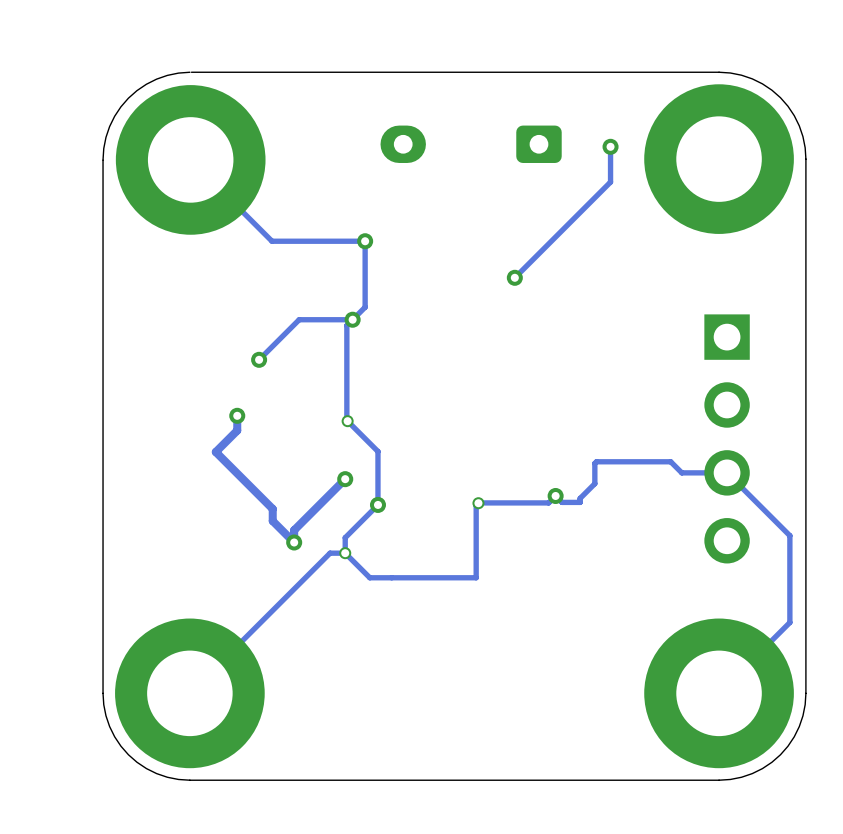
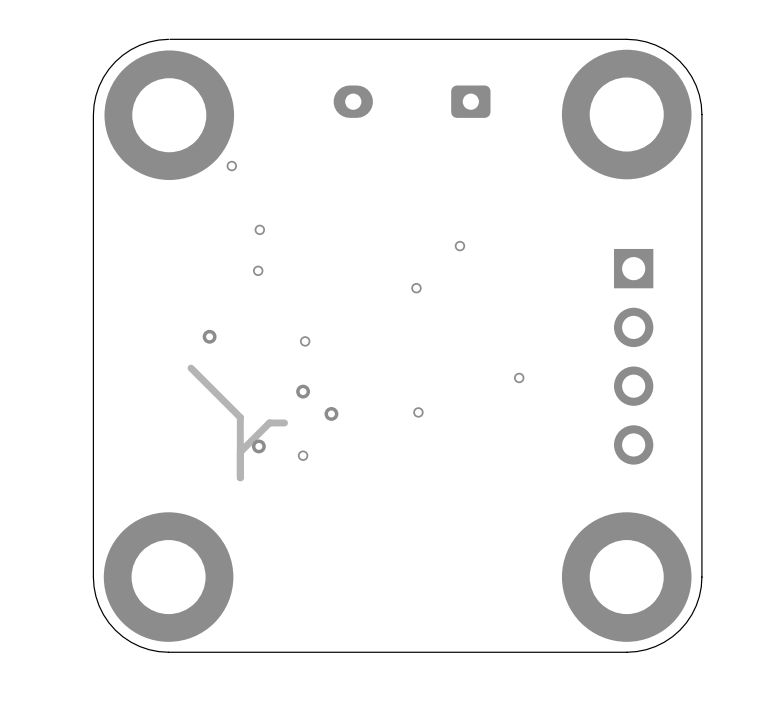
track: (610, 146) (610, 182) (514, 277) -> none
via: (610, 146) -> none
track: (190, 159) (272, 241) (365, 241) (365, 307) (346, 325) (346, 420) -> none
via: none -> (231, 166)
via: (365, 241) -> none
via: (514, 277) -> none
via: none -> (259, 229)
via: none -> (459, 246)
track: (352, 319) (299, 319) (259, 359) -> none
via: (352, 319) -> none
via: none -> (258, 270)
via: (259, 359) -> none
via: none -> (416, 288)
track: (237, 415) (237, 430) (215, 452) -> none
track: (347, 421) (377, 451) (377, 504) (345, 537) (345, 553) -> none
via: none -> (519, 377)
track: (345, 479) (294, 530) (294, 542) (272, 521) -> (240, 477) (240, 427)
via: (555, 495) -> none
track: (477, 502) (548, 502) (555, 495) (562, 502) (580, 502) (580, 498) (594, 483) (596, 461) (670, 461) (681, 472) (727, 472) (789, 535) (789, 622) (719, 693) -> none
track: (478, 503) (476, 505) (476, 577) (369, 577) (345, 553) -> none
track: none -> (284, 422) (269, 422) (240, 452)
track: (345, 553) (330, 553) (189, 693) -> none

